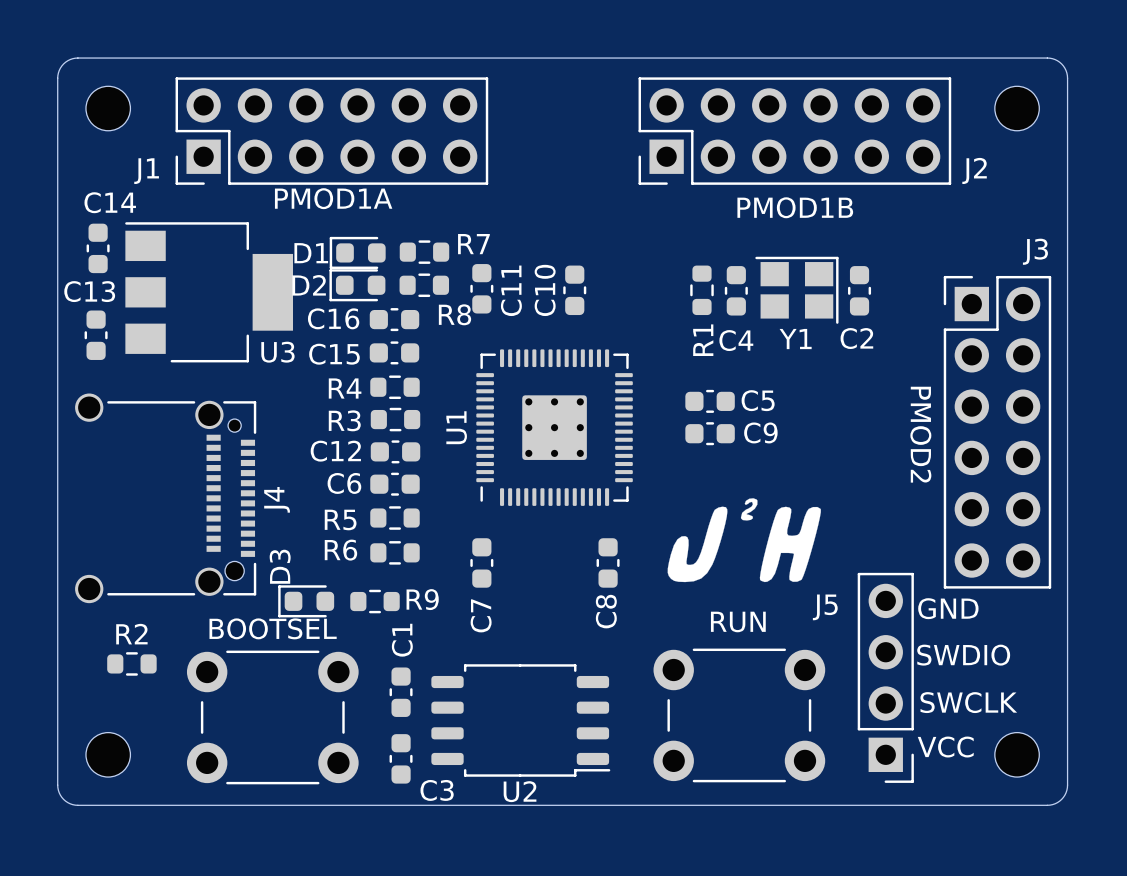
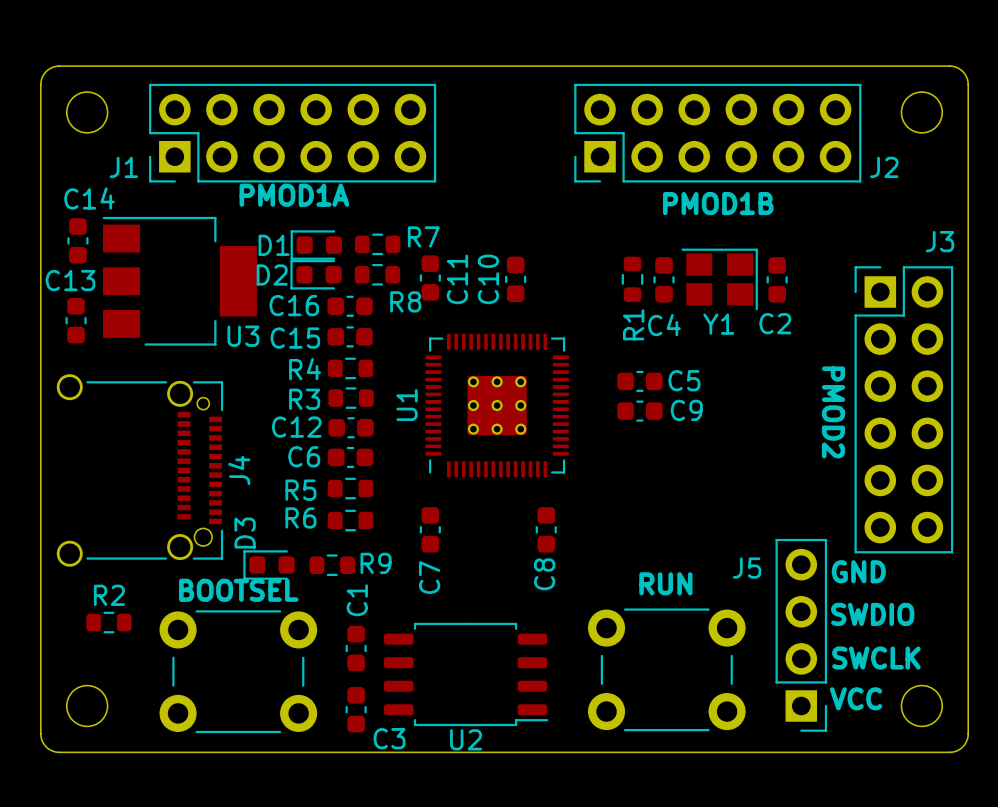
drawing: [667, 498, 821, 583] -> none

